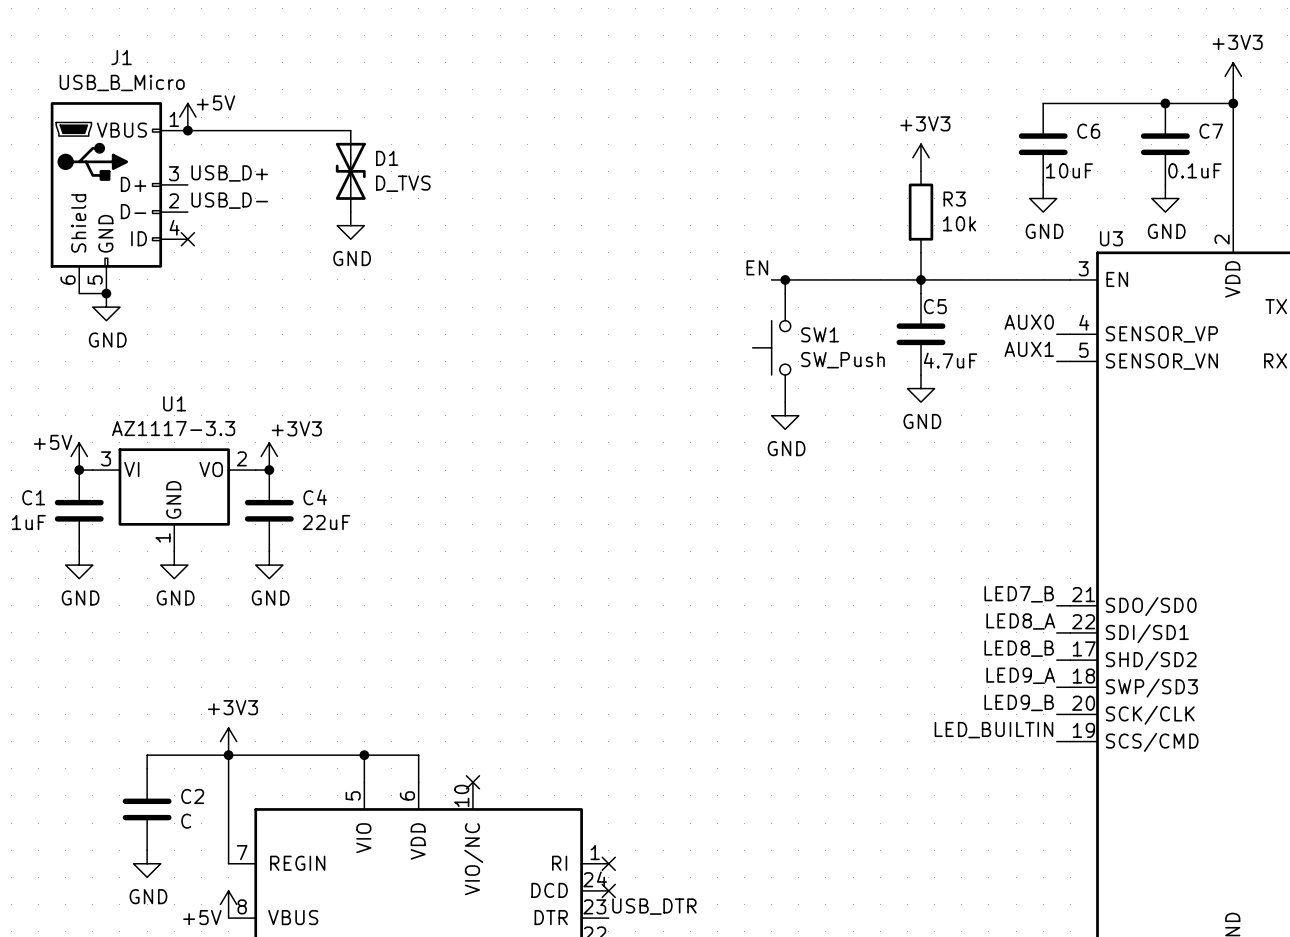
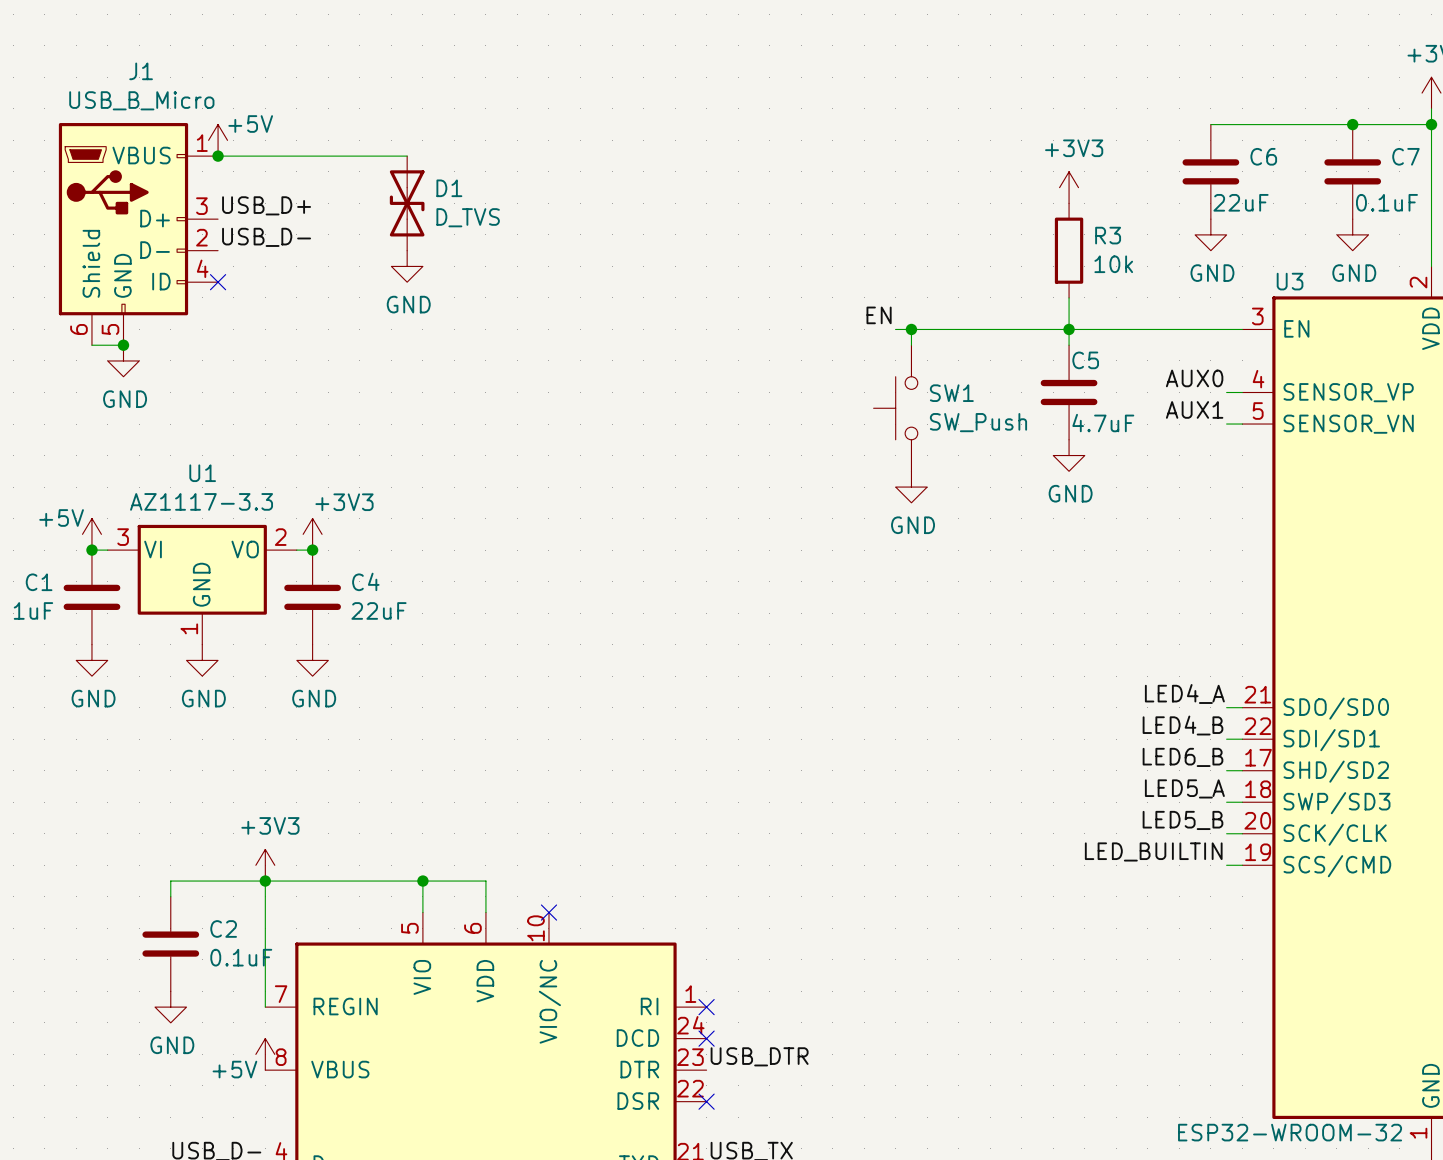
C6 value: 10uF (1069, 170) -> 22uF (1241, 202)
label: LED7_B (1019, 594) -> LED4_A (1184, 693)
label: LED8_A (1020, 621) -> LED4_B (1182, 725)
label: LED8_B (1019, 648) -> LED6_B (1182, 757)
label: LED9_A (1020, 675) -> LED5_A (1184, 788)
label: LED9_B (1019, 702) -> LED5_B (1182, 820)
C2 value: C (186, 821) -> 0.1uF (241, 957)

